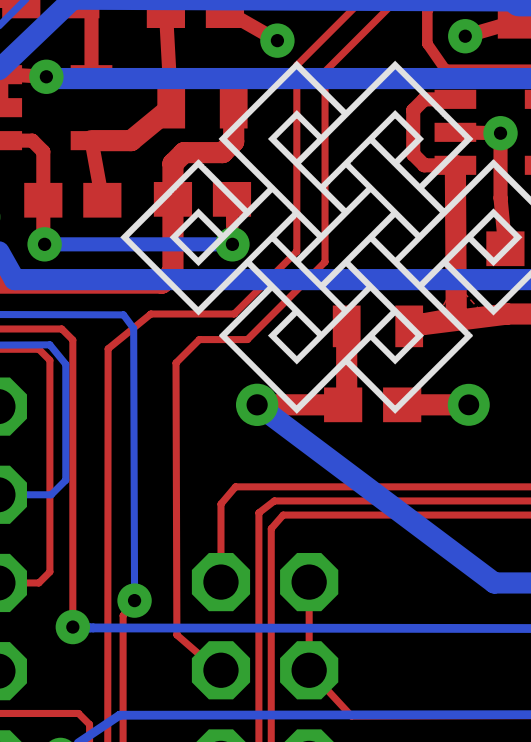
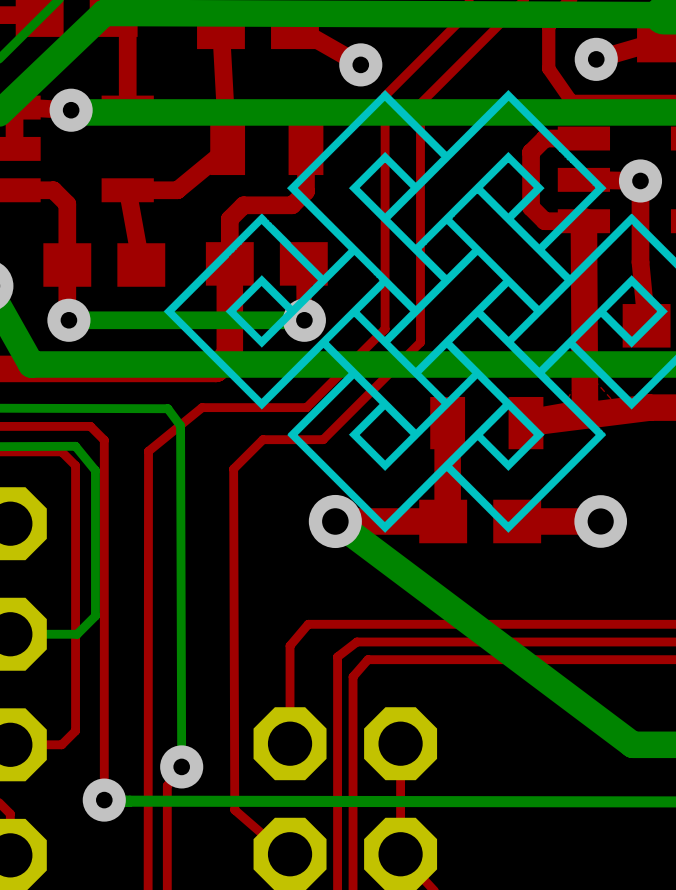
top track width: thick (171, 107) (131, 140) (91, 140) -> thin (227, 148) (177, 190) (127, 190)
top track width: thick (233, 107) (233, 141) (222, 152) (183, 152) (172, 163) (172, 199) -> thin (305, 148) (305, 191) (292, 205) (243, 205) (229, 219) (229, 263)

